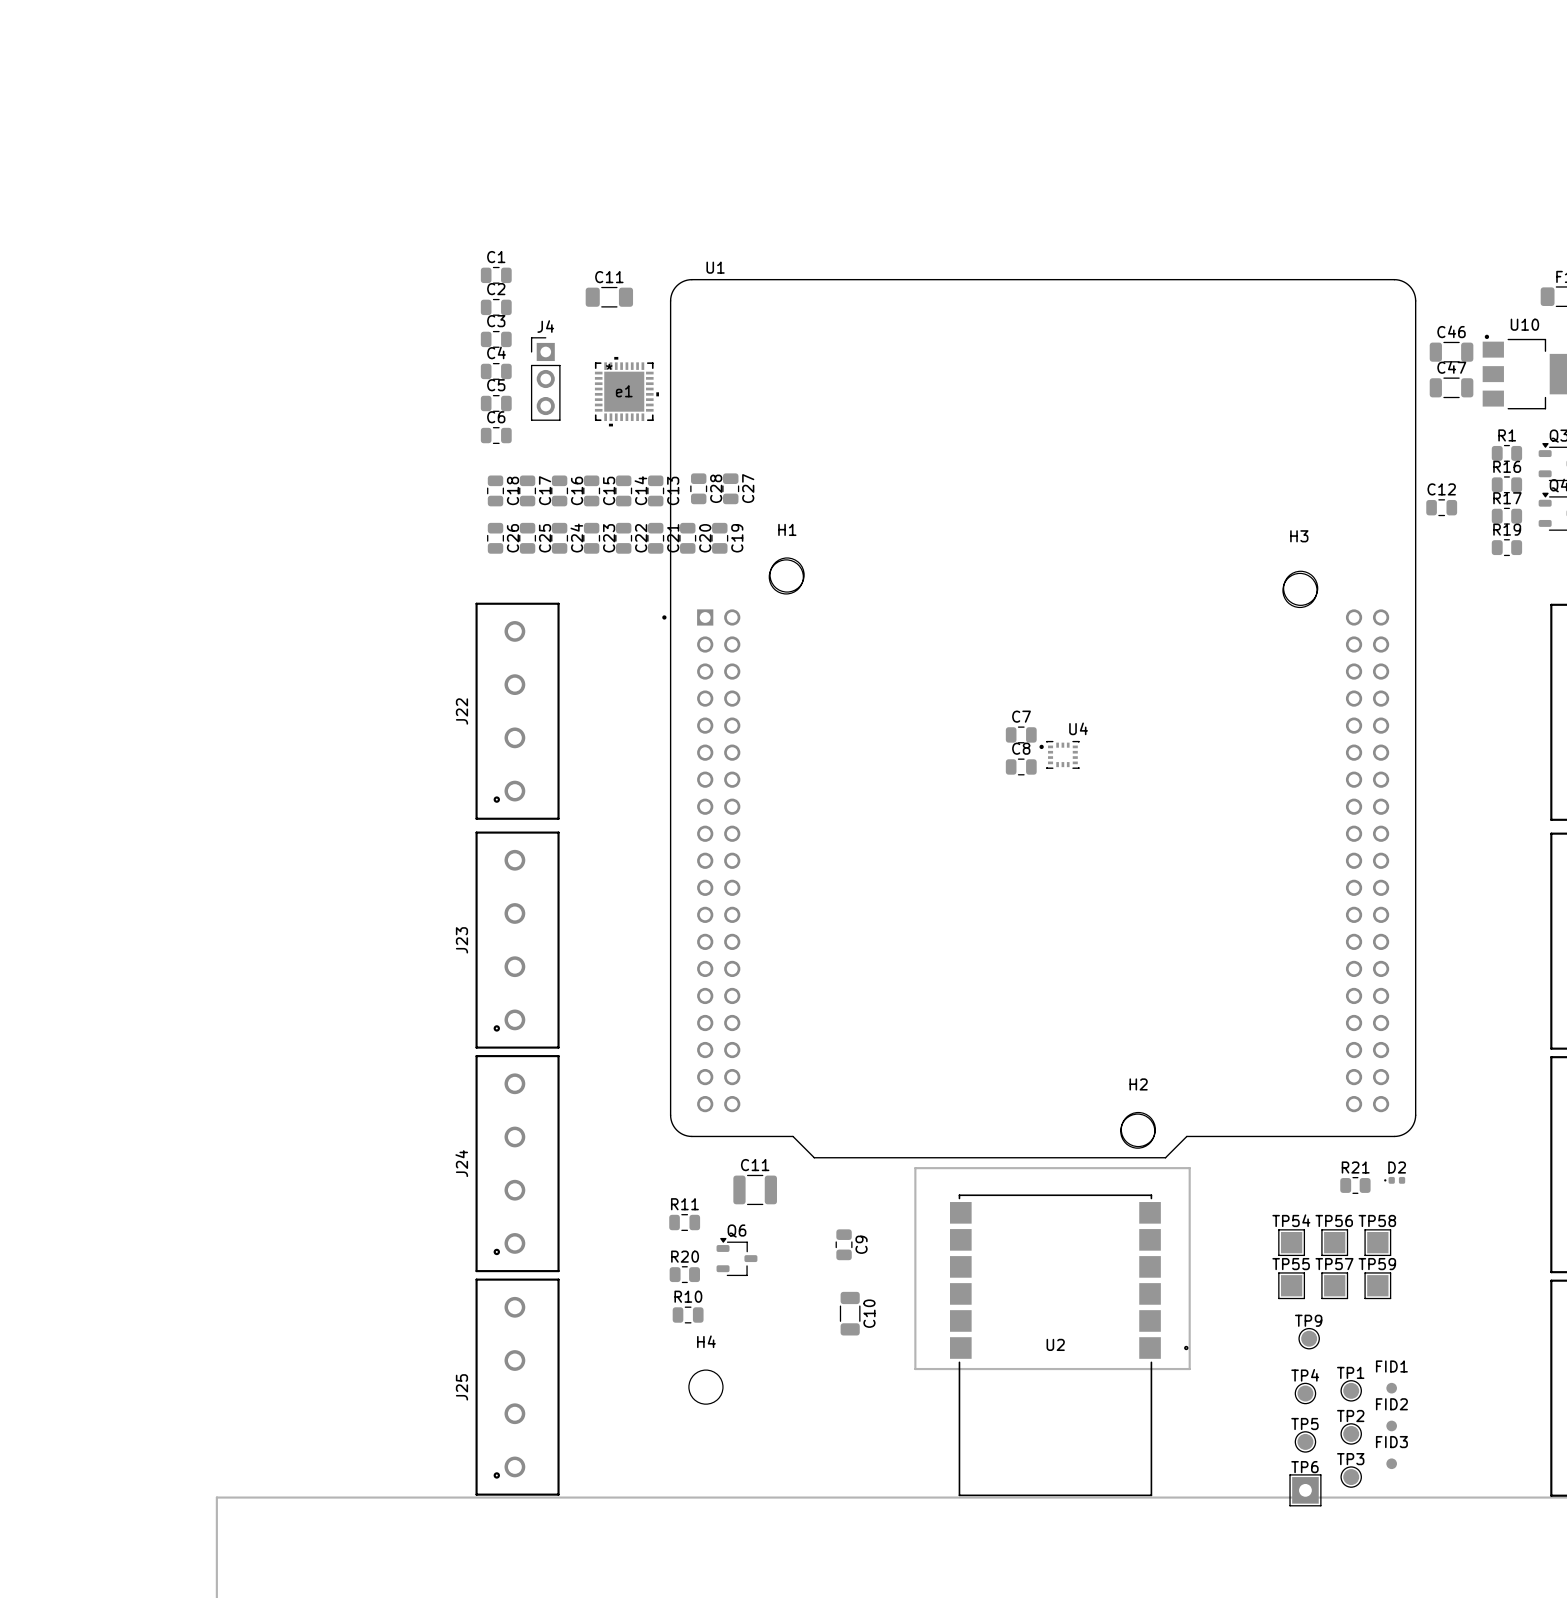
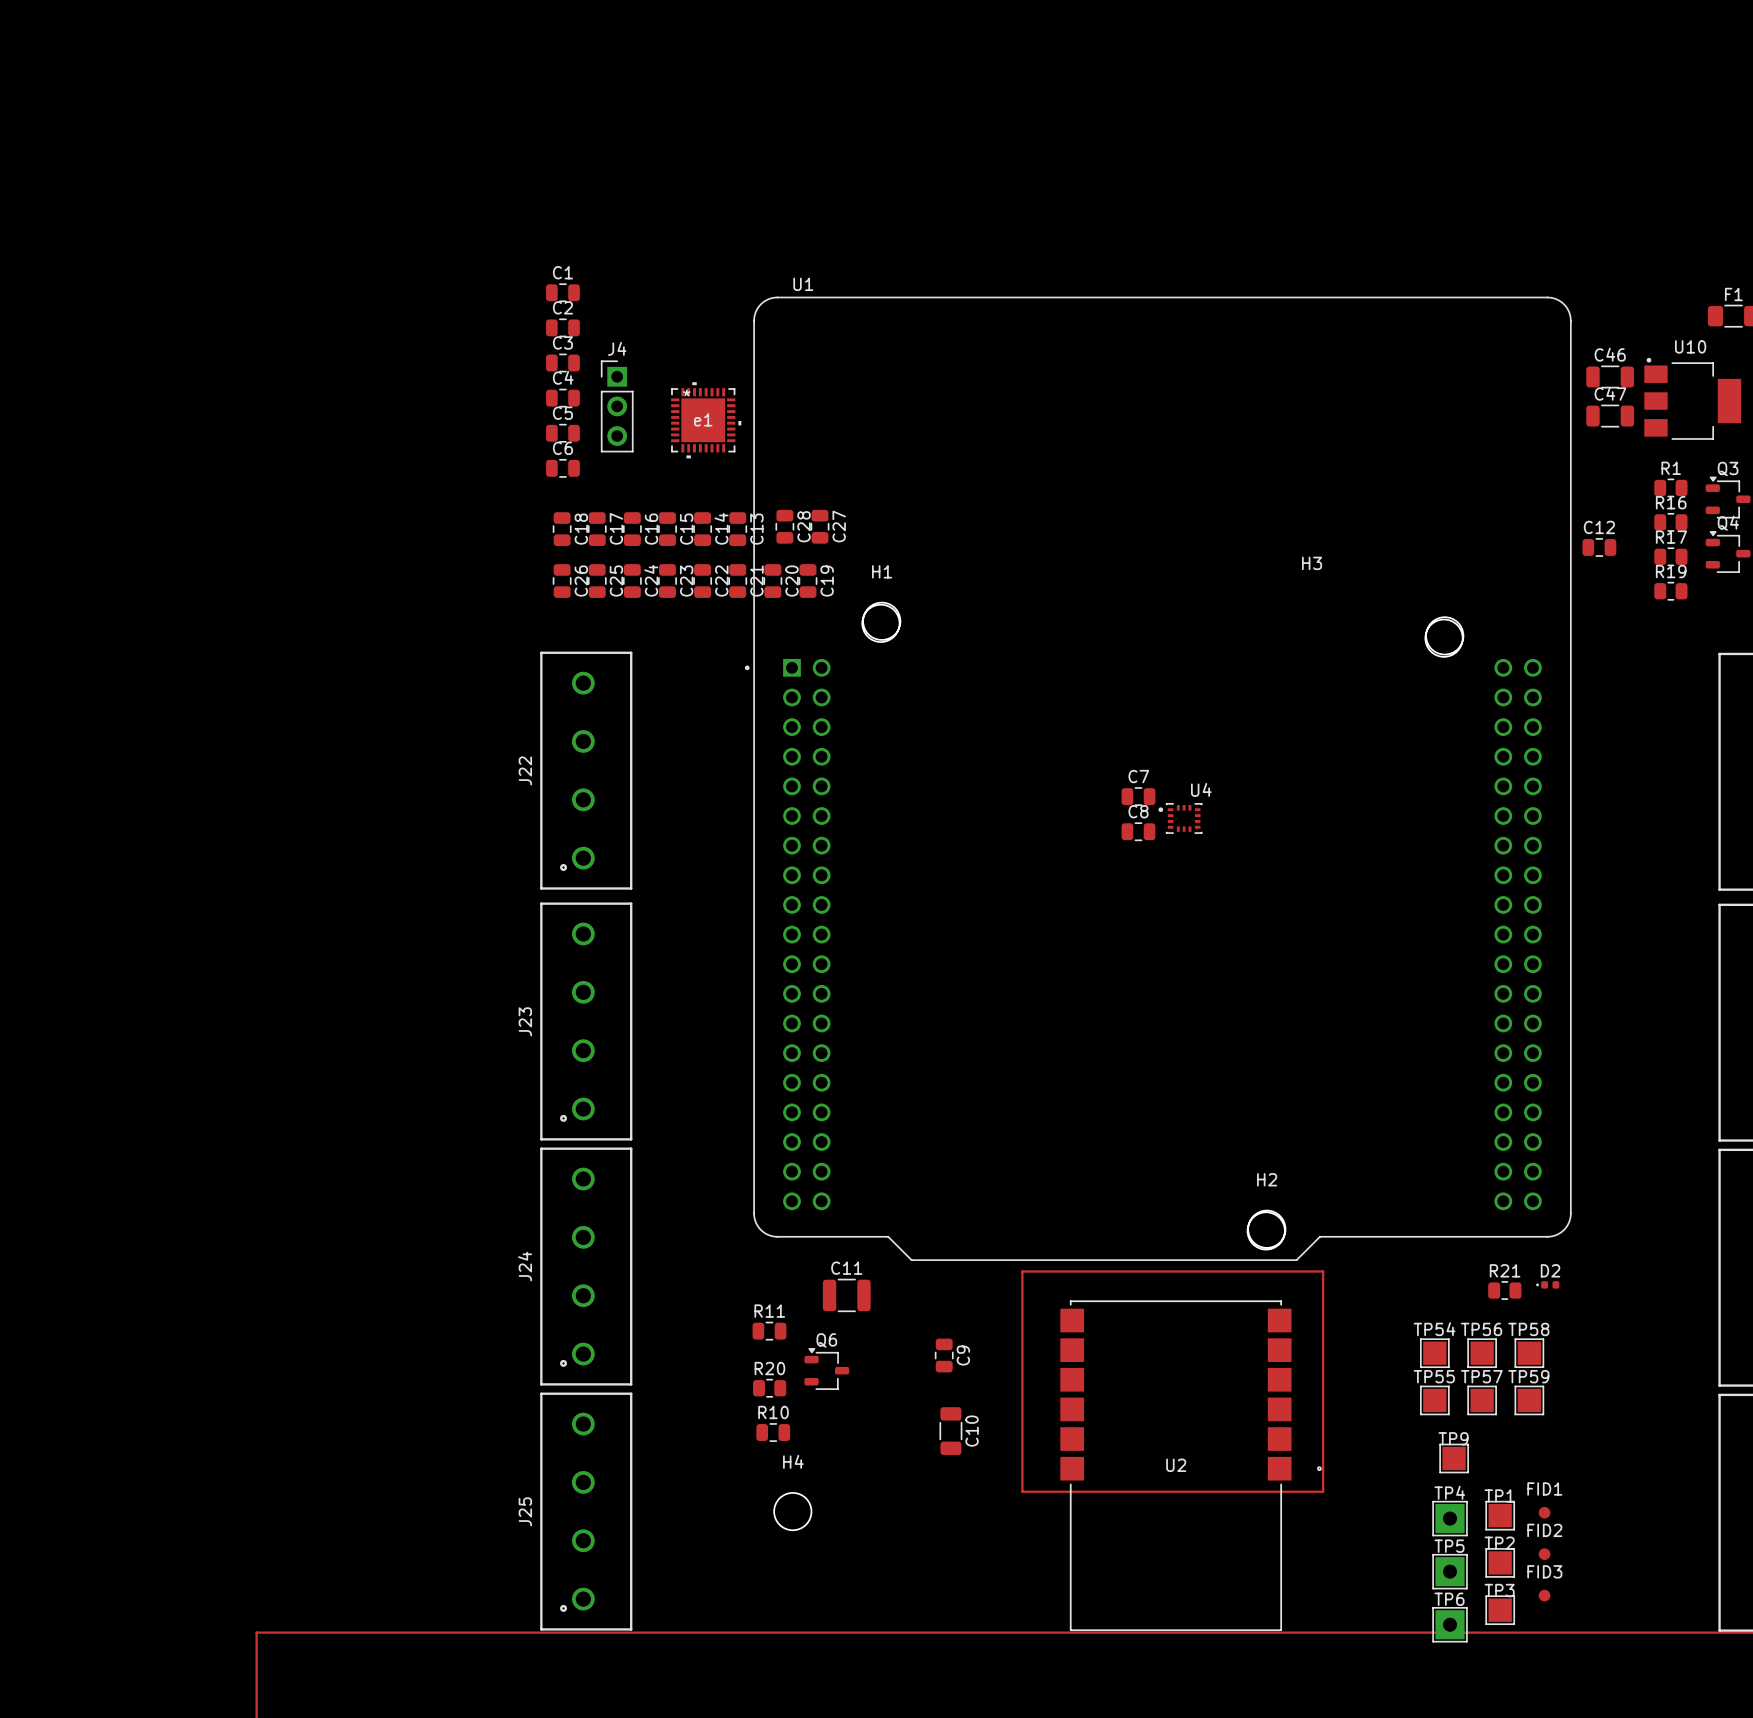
C11: (609, 297) -> none
H3 name position: H3 (1299, 536) -> H3 (1312, 563)
TP9 footprint: [1298, 1327, 1320, 1350] -> [1439, 1443, 1469, 1474]
TP1 footprint: [1340, 1380, 1362, 1402] -> [1485, 1500, 1515, 1531]
TP4 footprint: [1294, 1382, 1317, 1405] -> [1432, 1500, 1468, 1537]
TP2 footprint: [1340, 1423, 1362, 1445] -> [1485, 1548, 1515, 1578]
TP5 footprint: [1294, 1431, 1317, 1453] -> [1432, 1554, 1468, 1590]
TP3 footprint: [1340, 1466, 1362, 1488] -> [1485, 1595, 1515, 1625]

